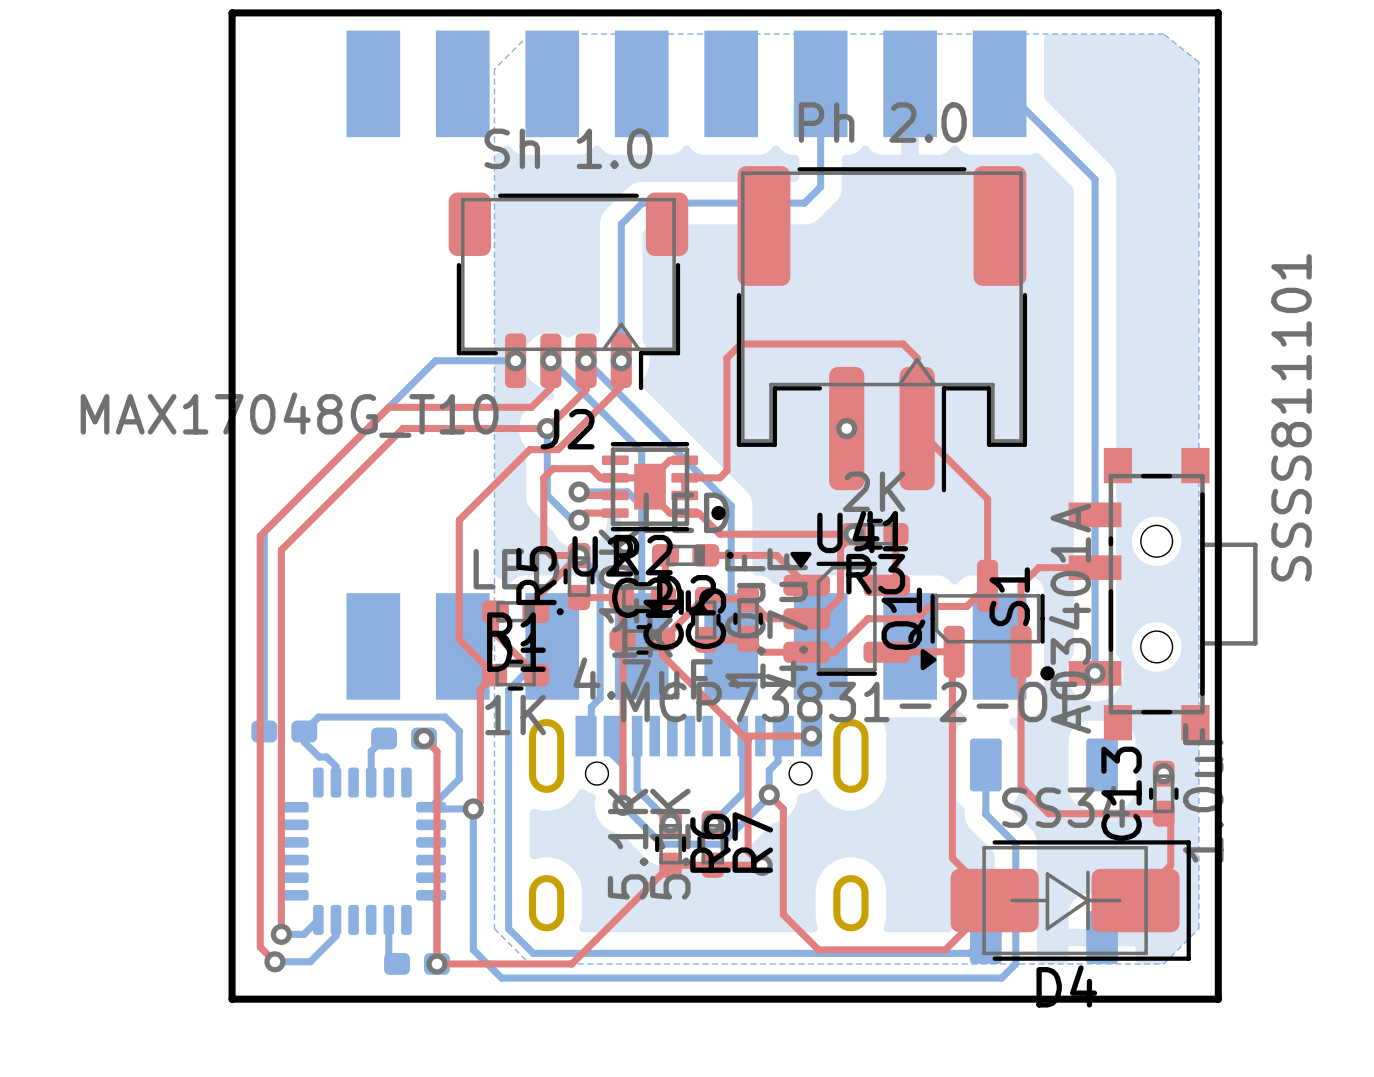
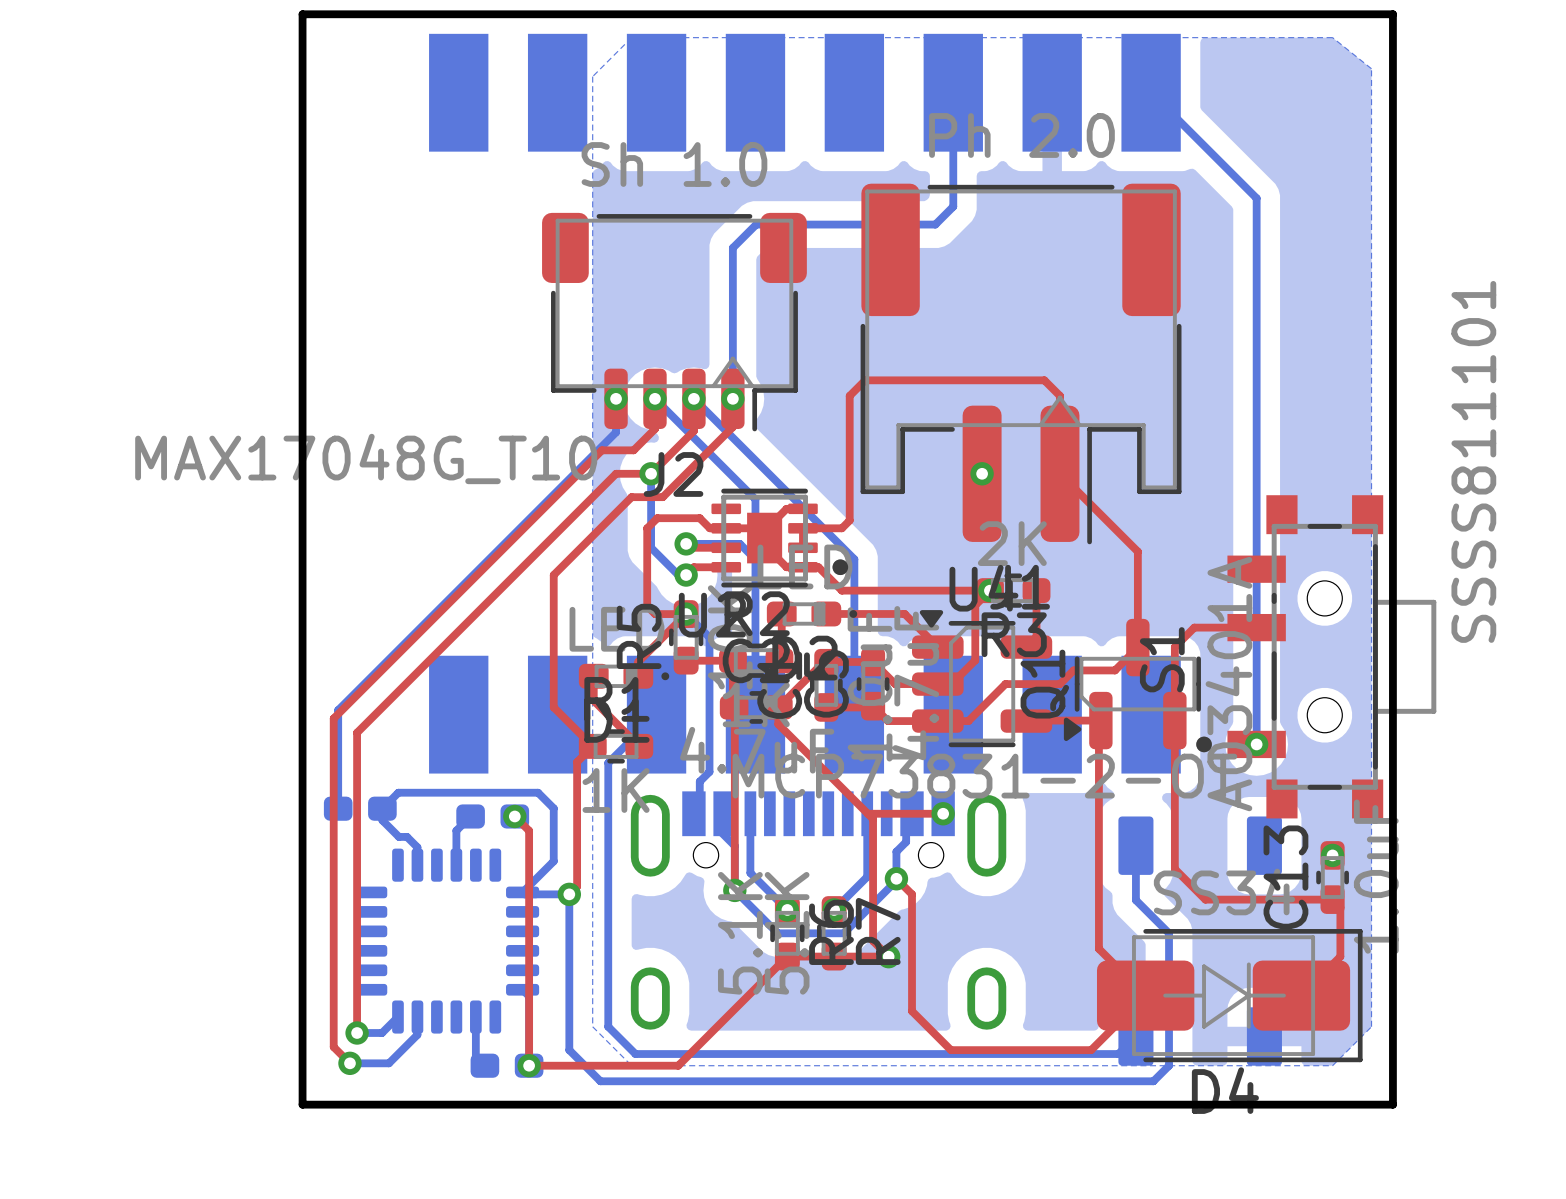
bottom track: (515, 360) (435, 360) (264, 531) (264, 642) -> (616, 398) (616, 432) (338, 710)
top track: (502, 407) (388, 407) (260, 535) (260, 649) -> (601, 450) (333, 718)
top track: (515, 428) (402, 428) (281, 550) (281, 662) -> (616, 473) (357, 732)

